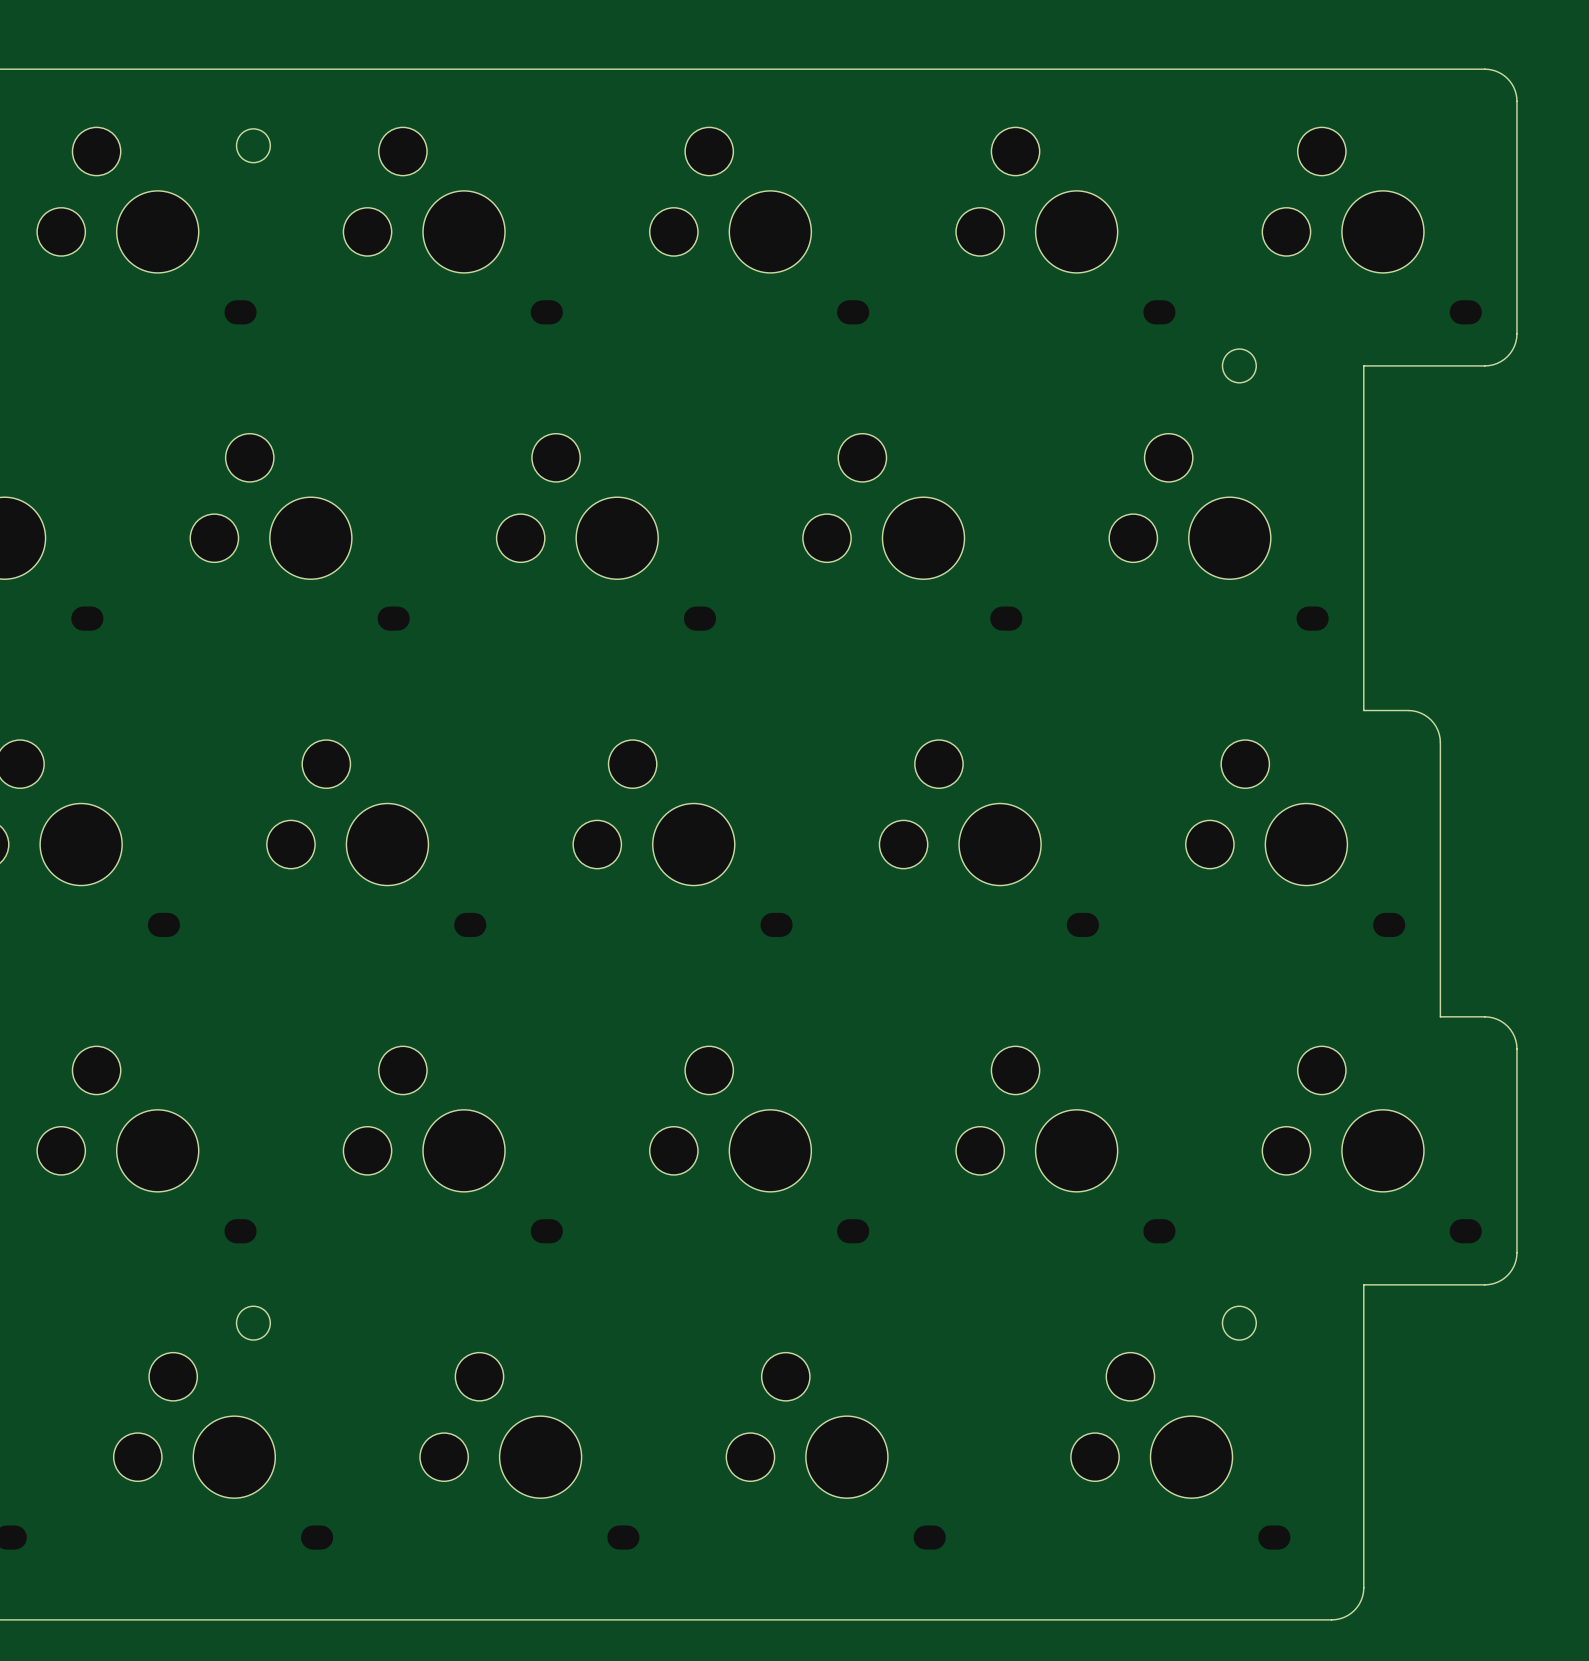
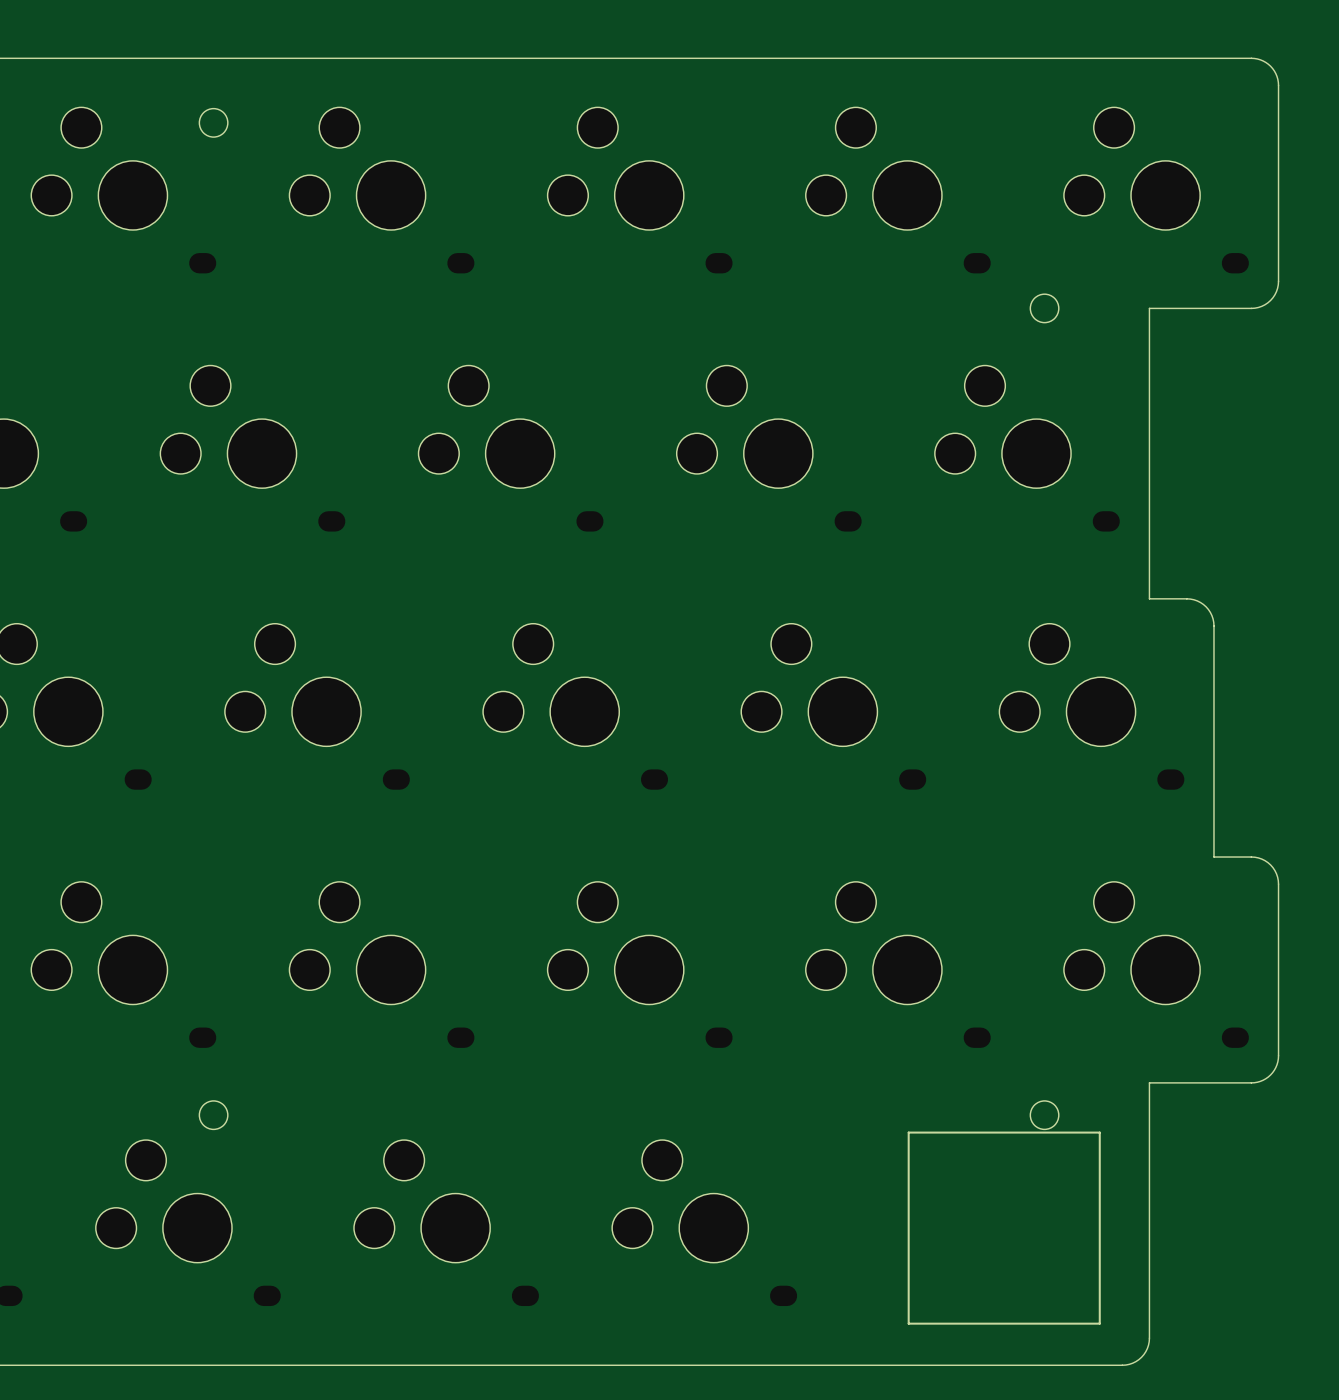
drawing: none -> [907, 1131, 1101, 1325]
part: (1180, 1451) -> none

